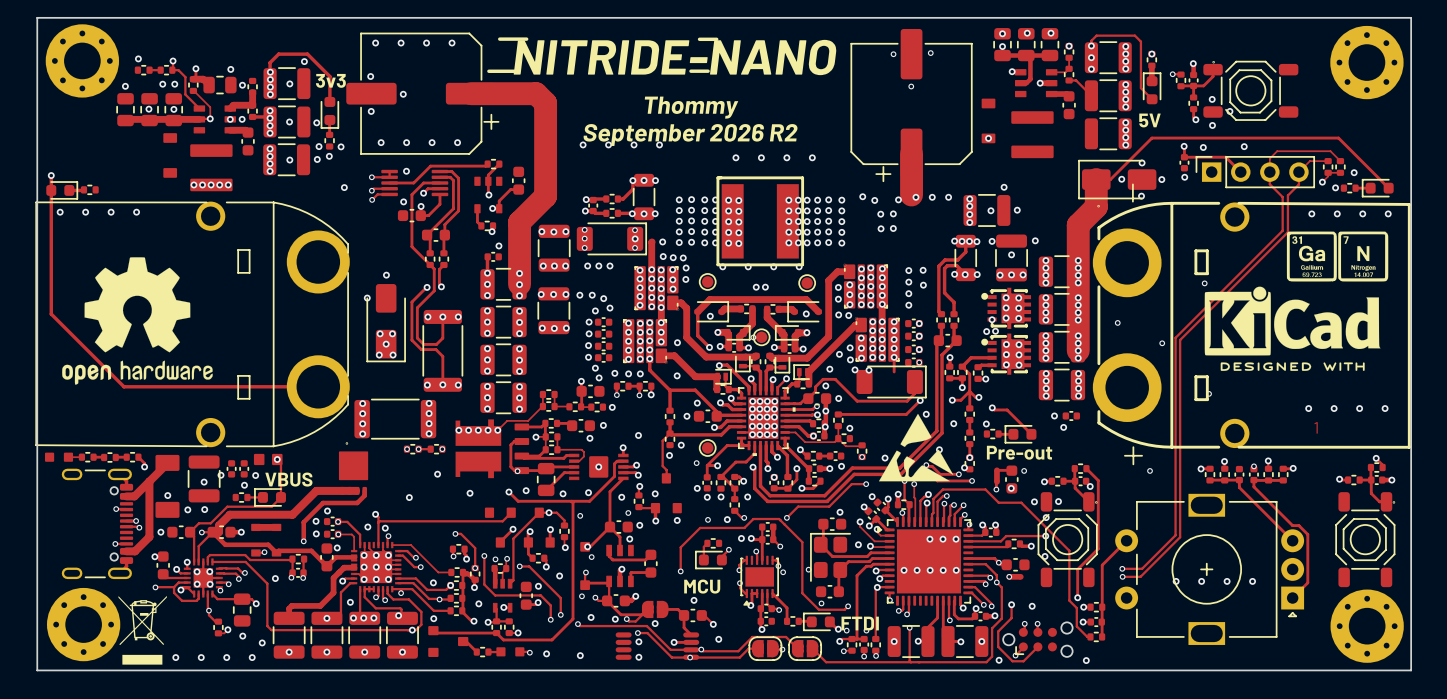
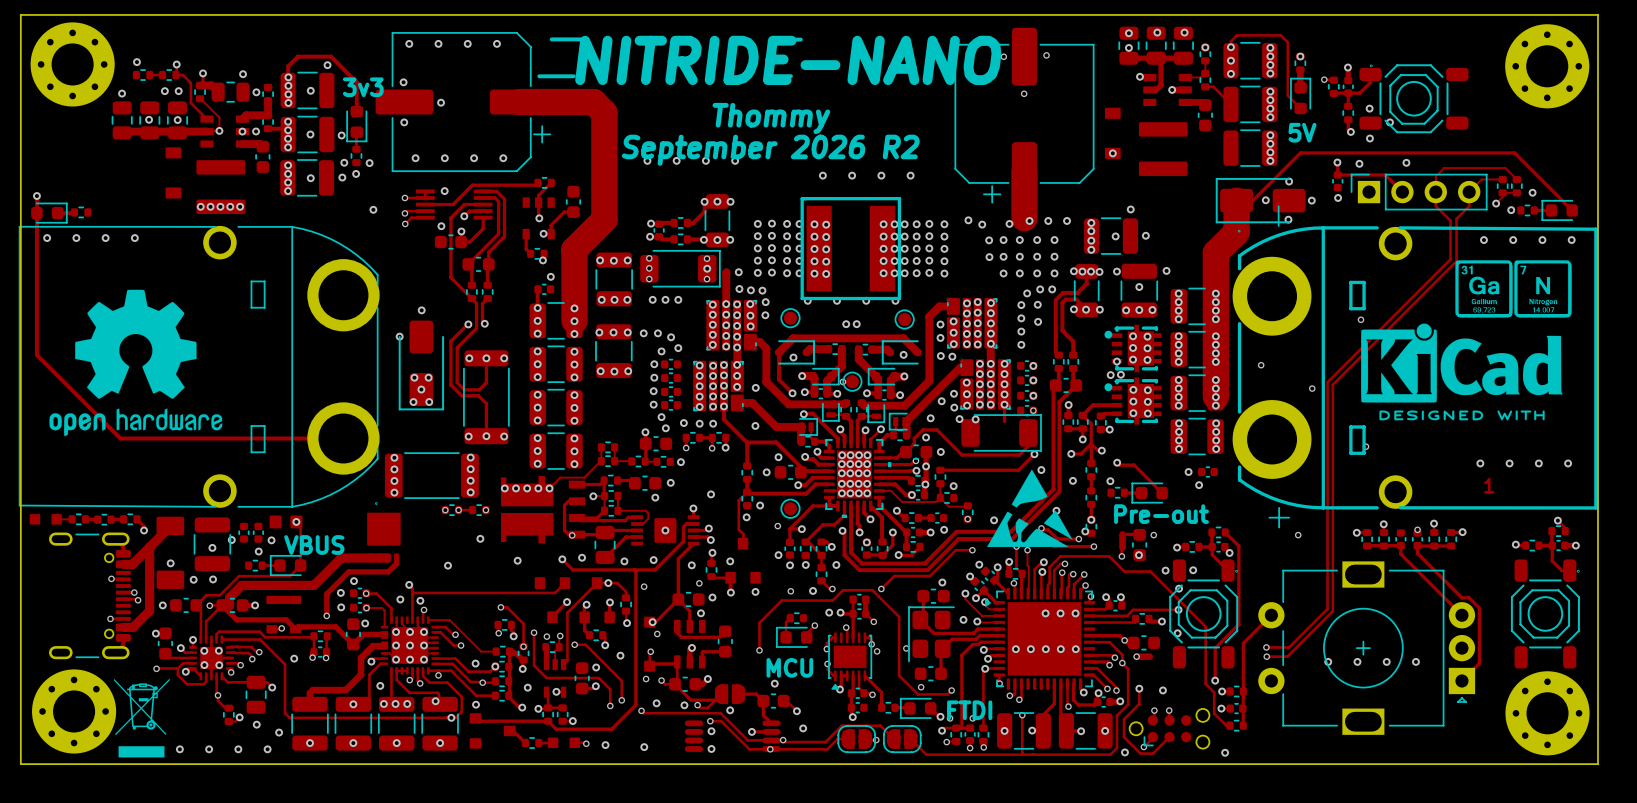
via: none -> (1019, 240)
via: none -> (1037, 240)
via: none -> (1054, 240)
via: none -> (1019, 256)
via: none -> (1037, 256)
via: none -> (1054, 256)
via: none -> (1019, 273)
via: none -> (1037, 273)
via: none -> (1054, 273)
via: none -> (1003, 273)
via: none -> (1040, 289)
via: none -> (1052, 289)
via: none -> (1027, 293)

